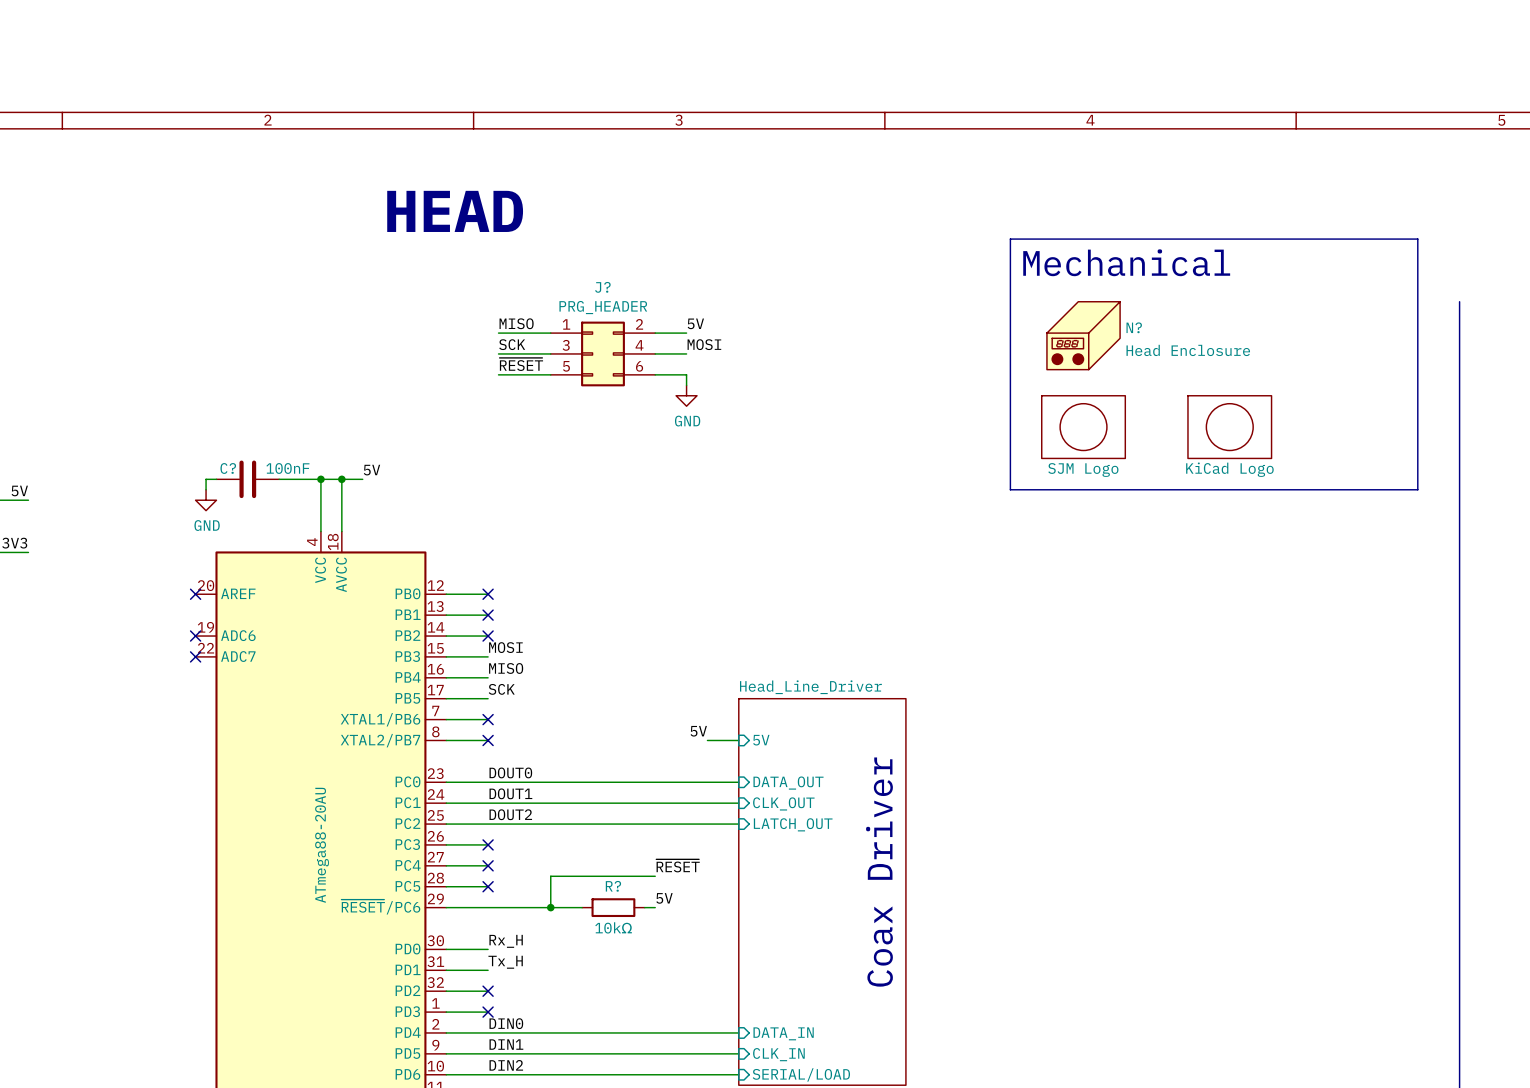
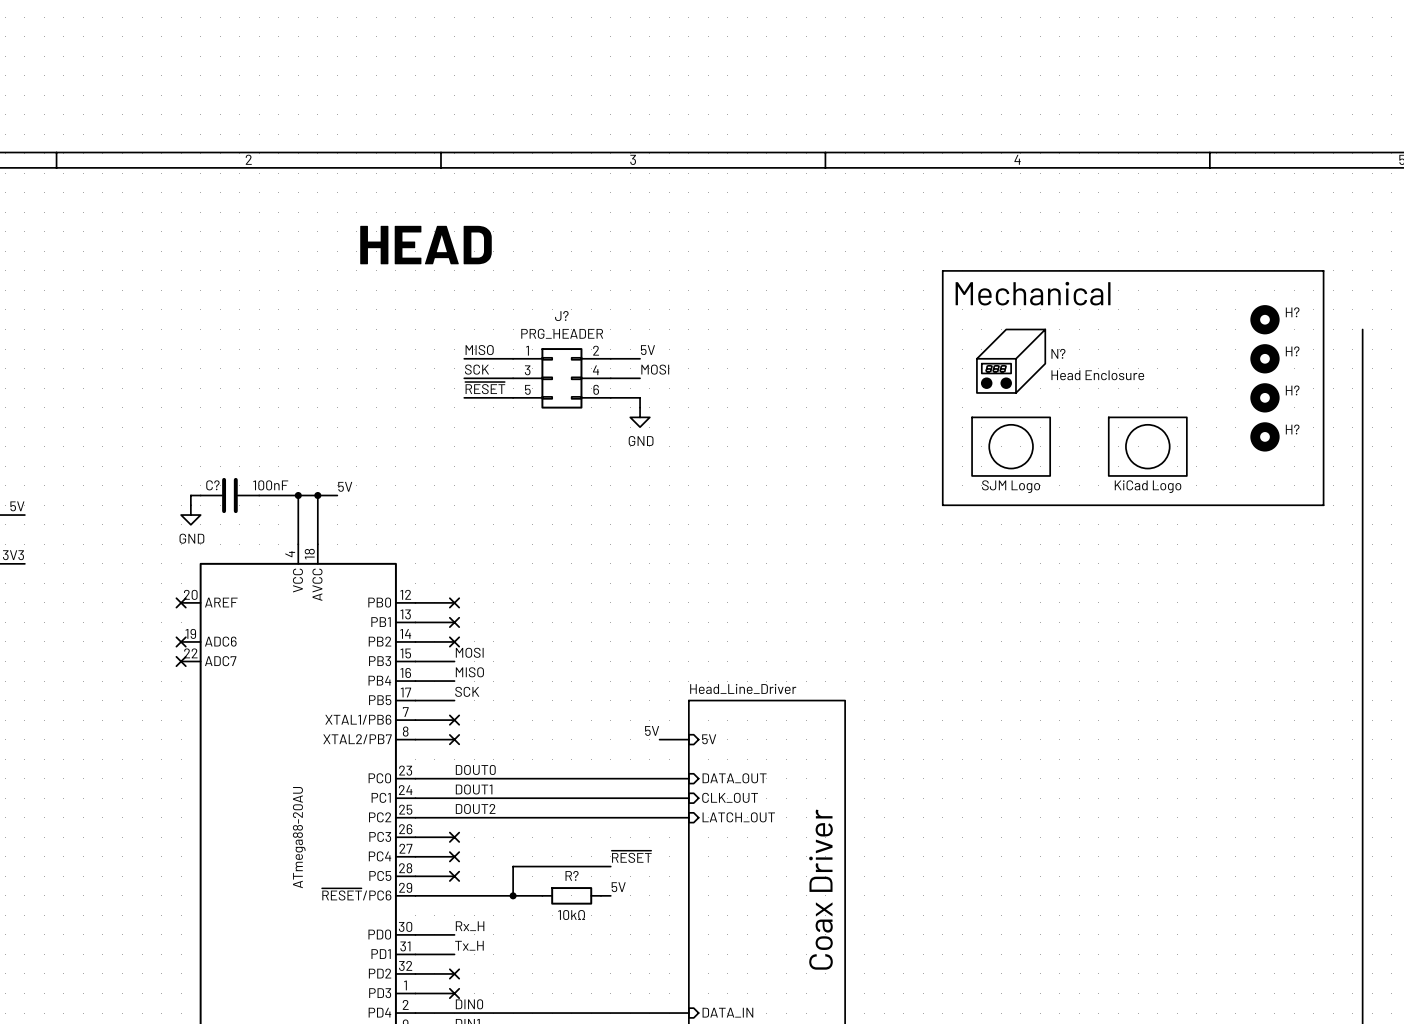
H?: none -> (1264, 319)
H?: none -> (1264, 358)
H?: none -> (1264, 397)
H?: none -> (1264, 436)

